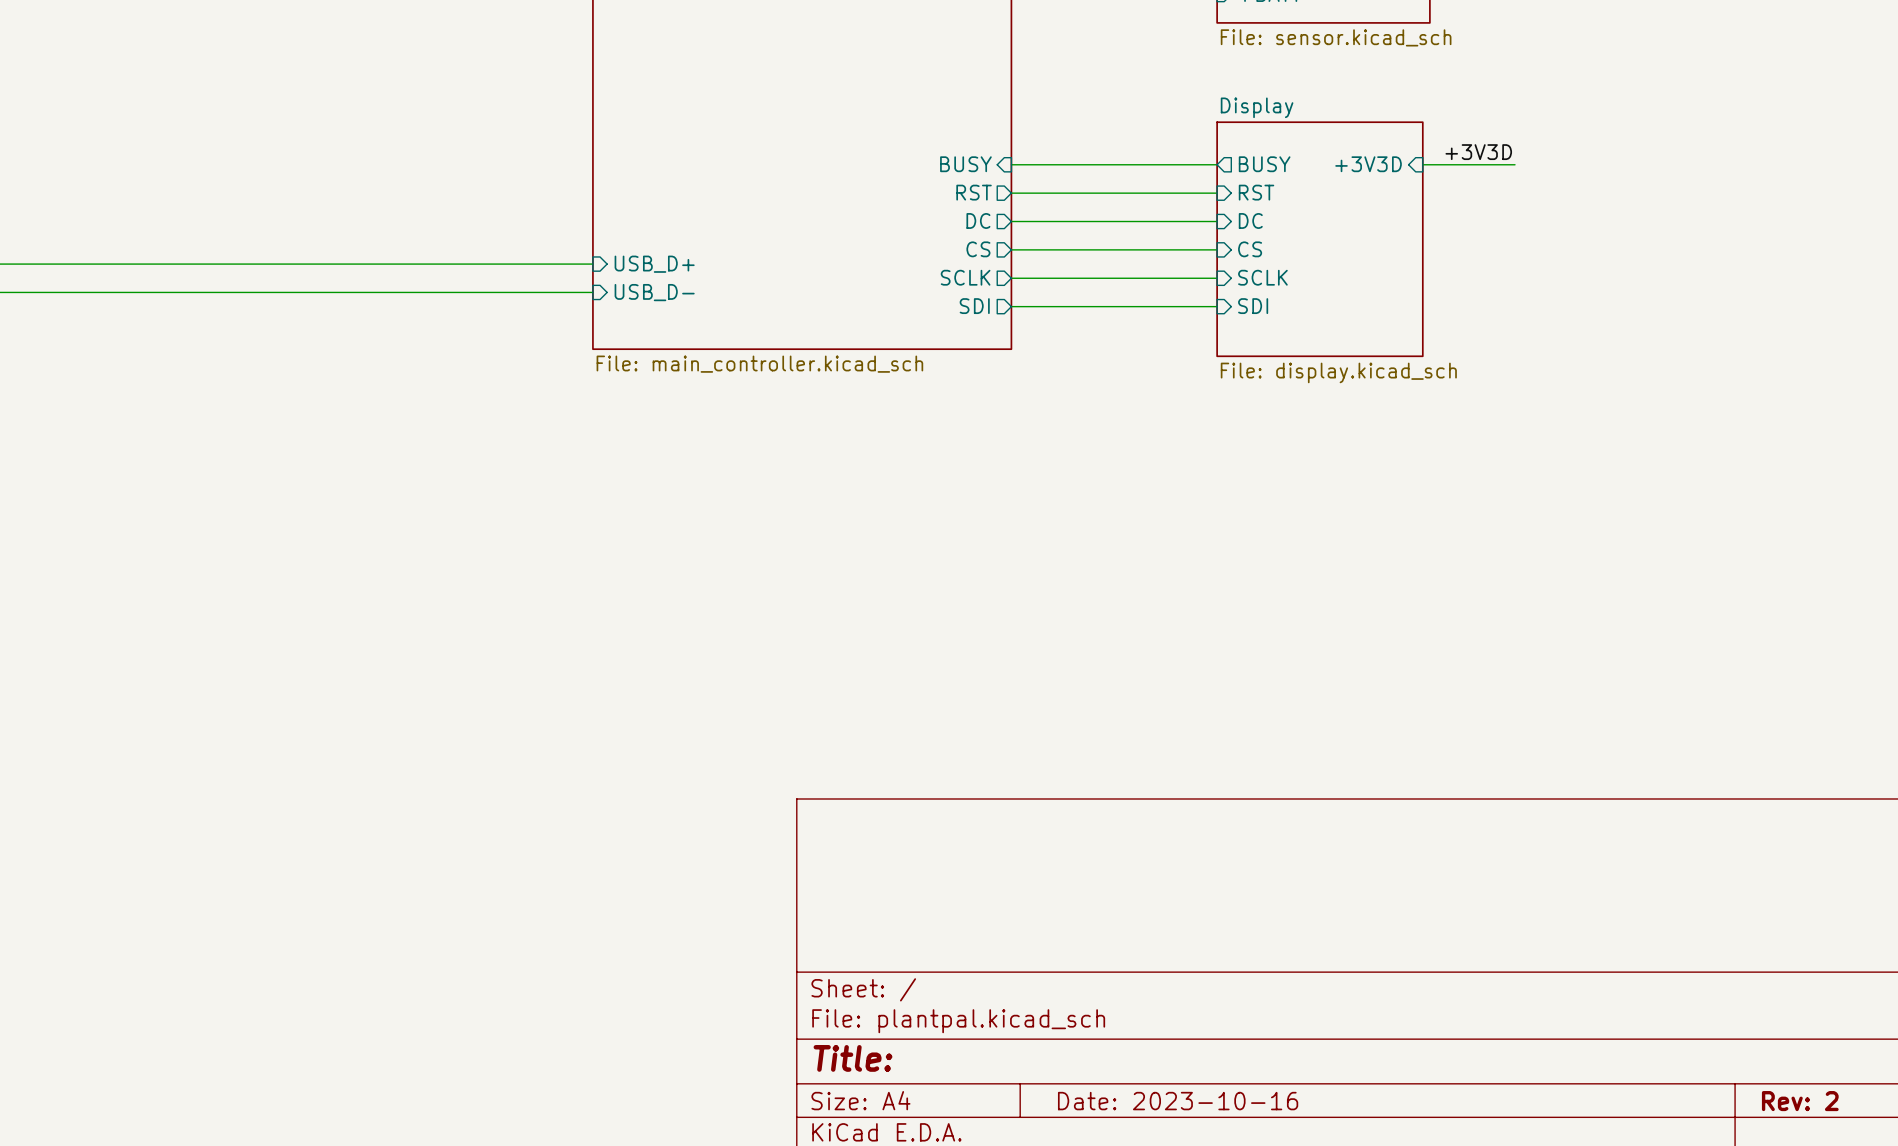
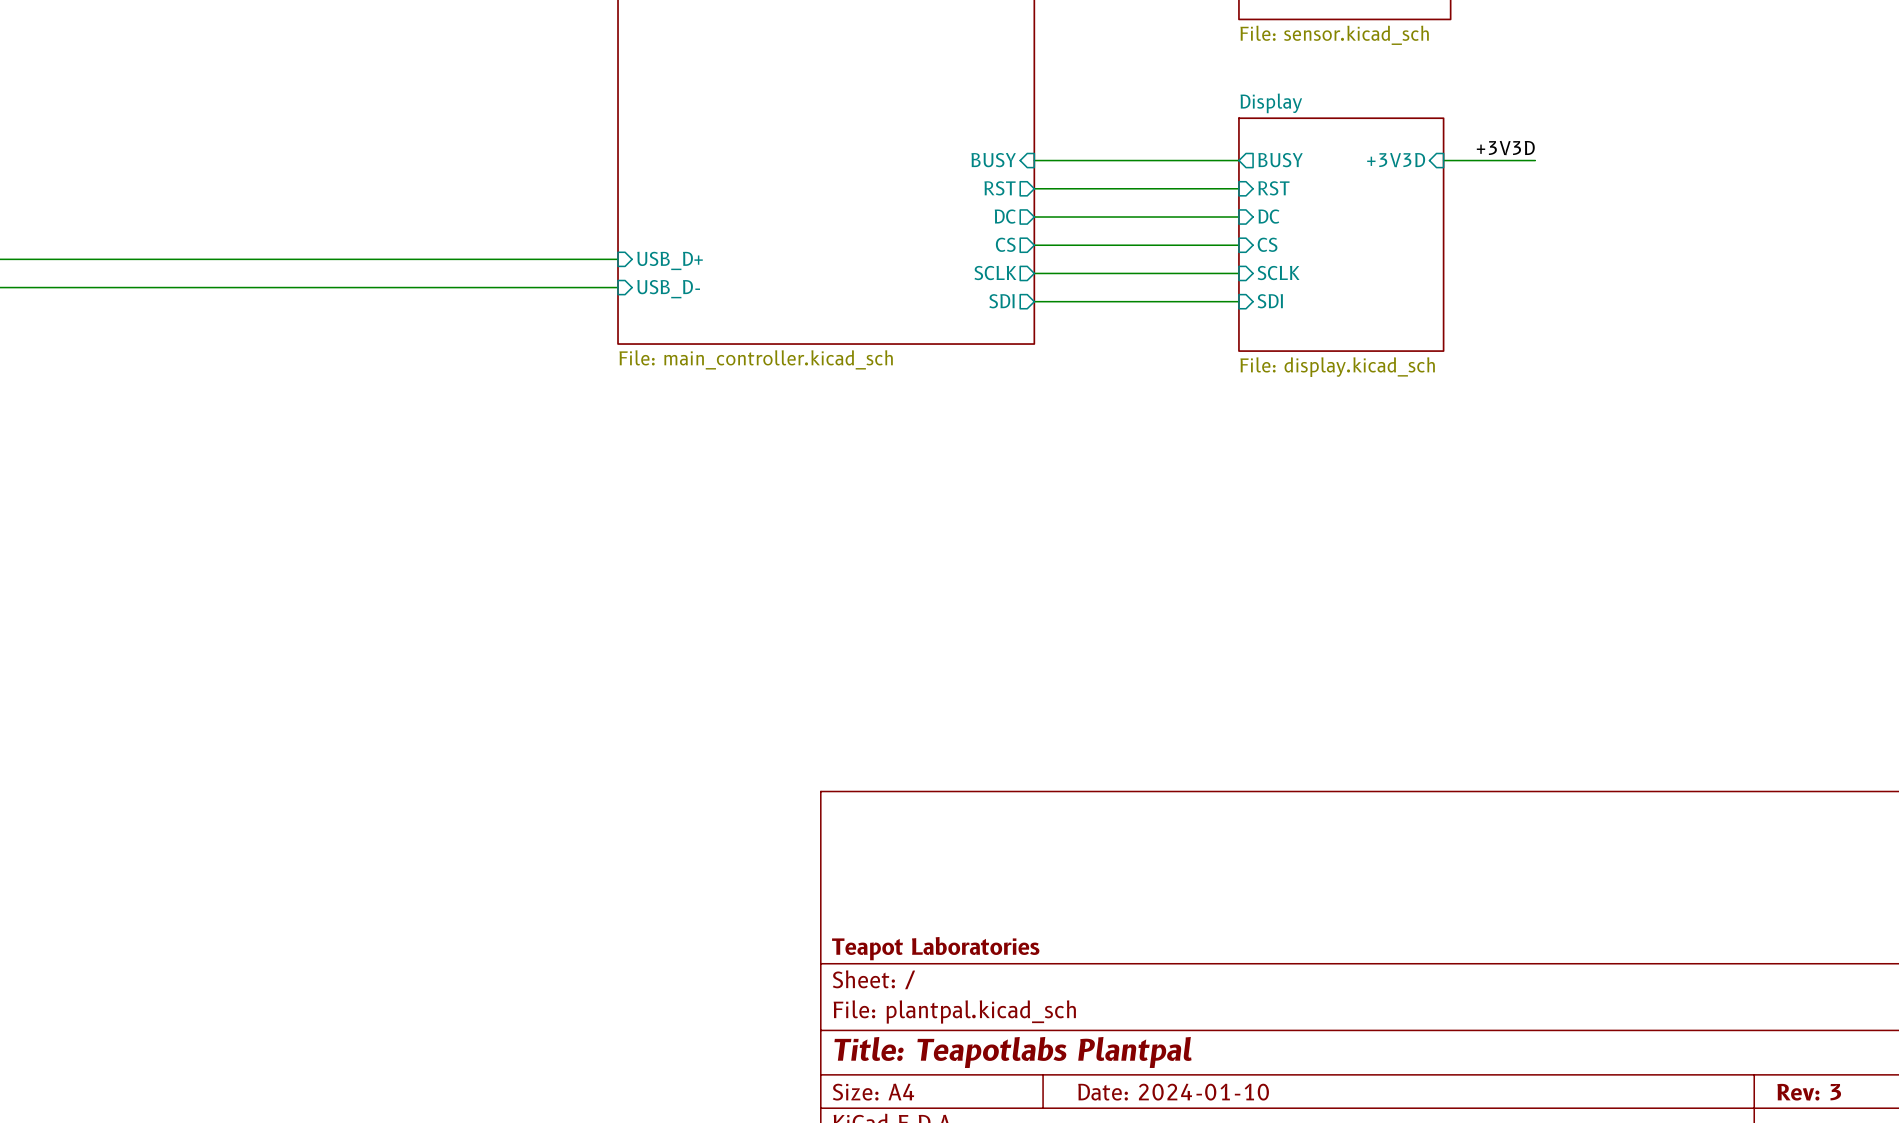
title block: none -> Teapot Laboratories (935, 948)
title block: Title: (852, 1058) -> Title: Teapotlabs Plantpal (1012, 1052)
title block: Date: 2023-10-16 (1178, 1101) -> Date: 2024-01-10 (1173, 1092)
title block: Rev: 2 (1800, 1101) -> Rev: 3 (1809, 1092)

